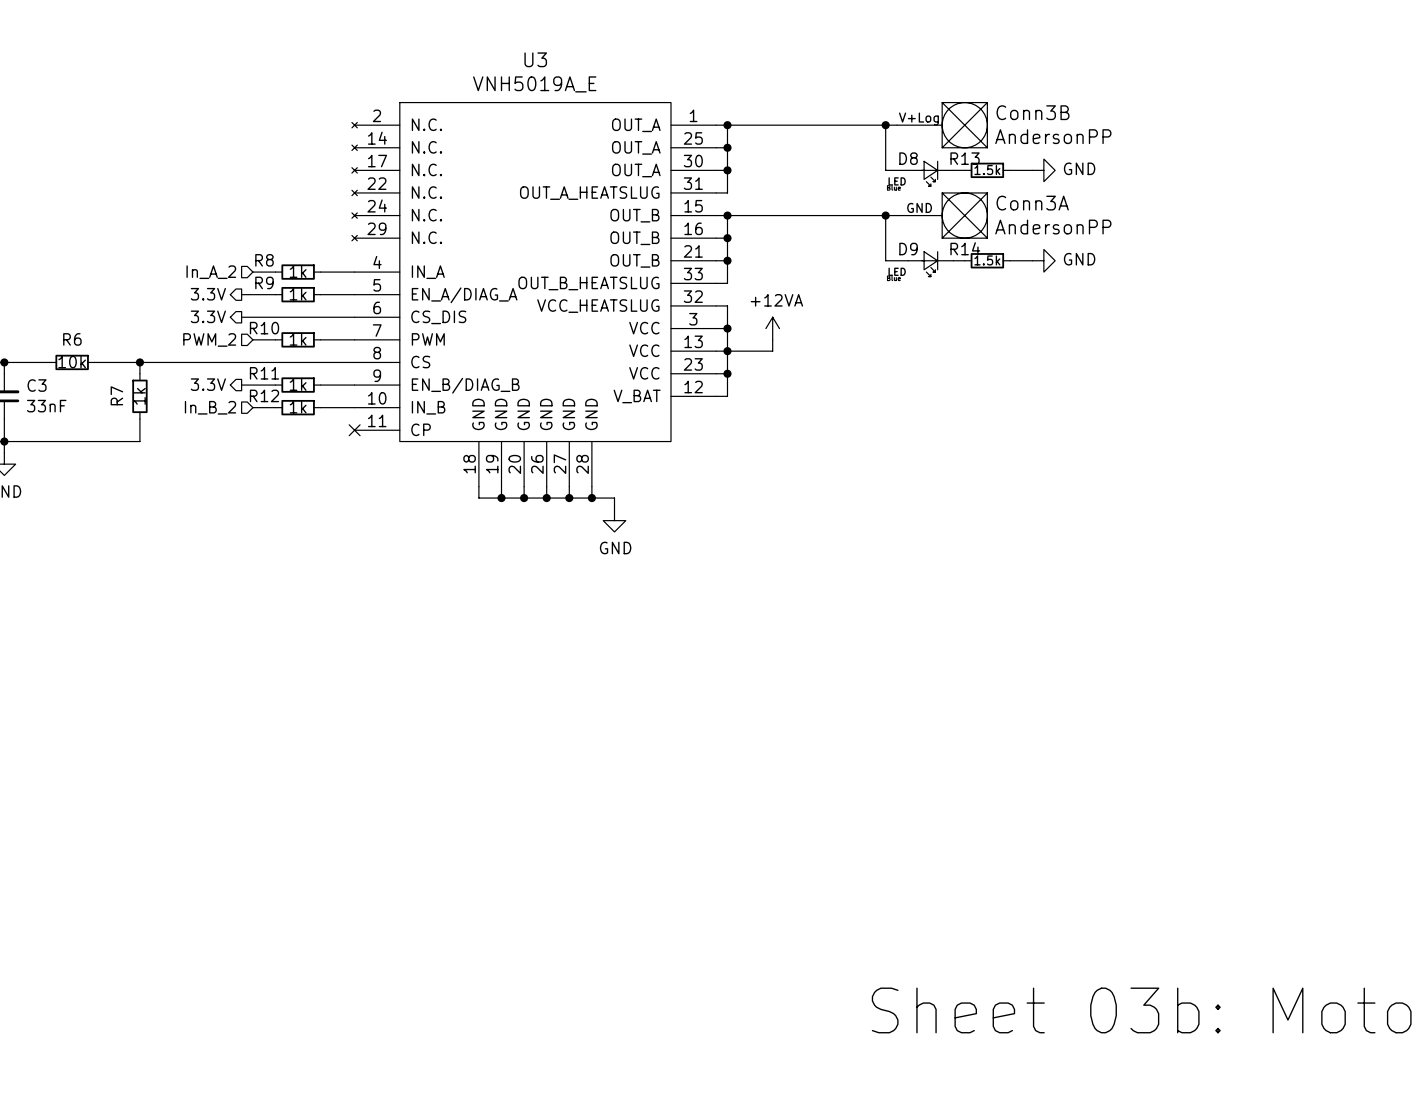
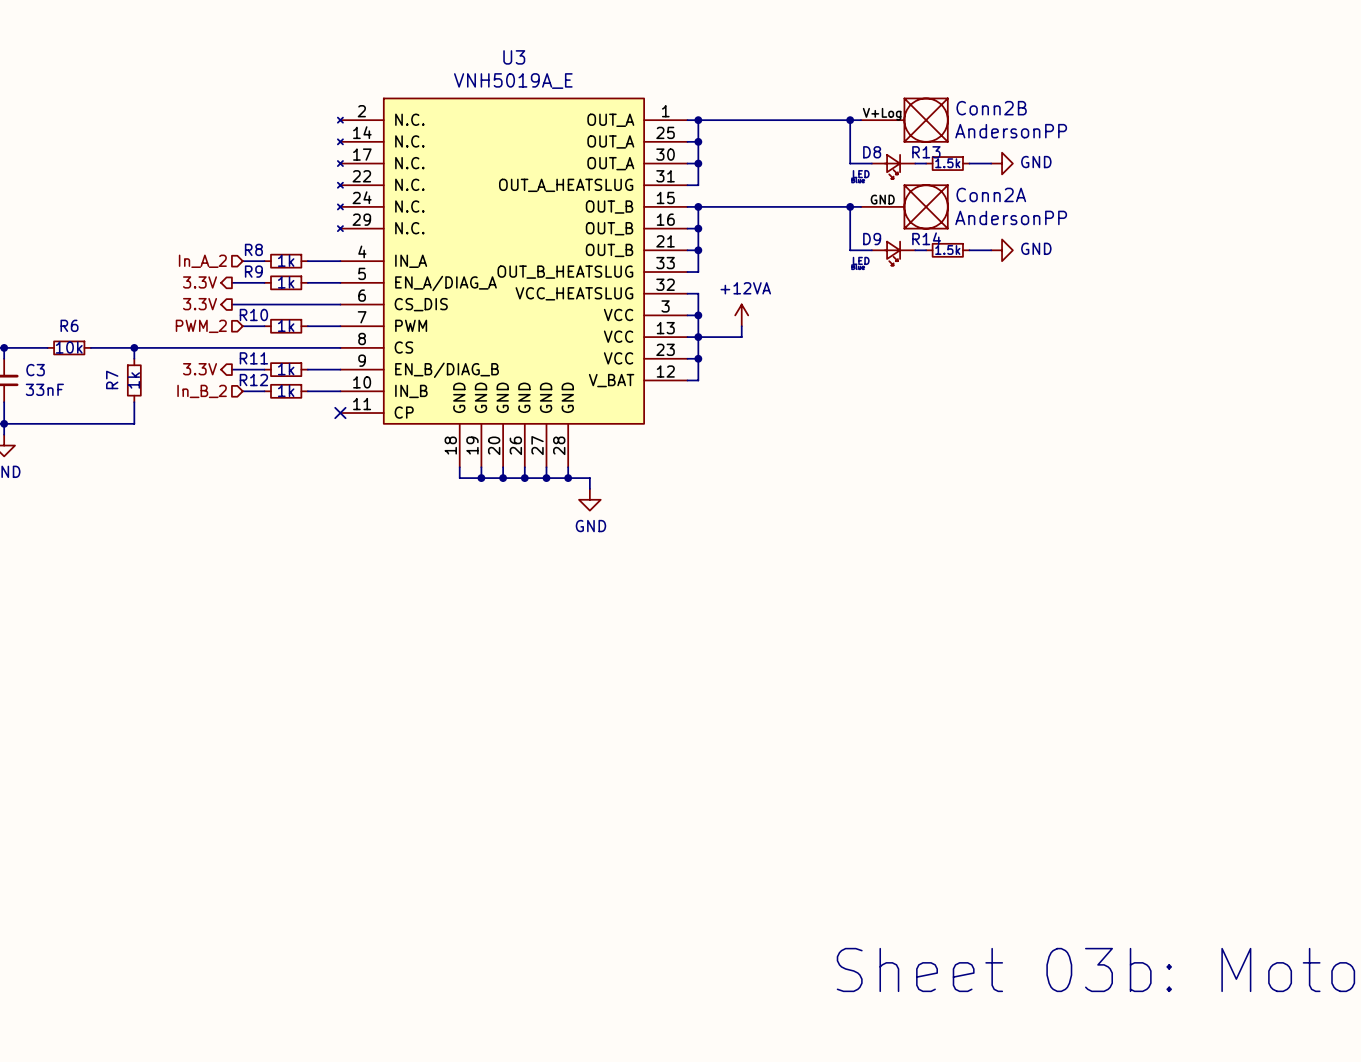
Conn3B name: Conn3B (1033, 112) -> Conn2B (991, 108)
Conn3A name: Conn3A (1032, 203) -> Conn2A (991, 194)

